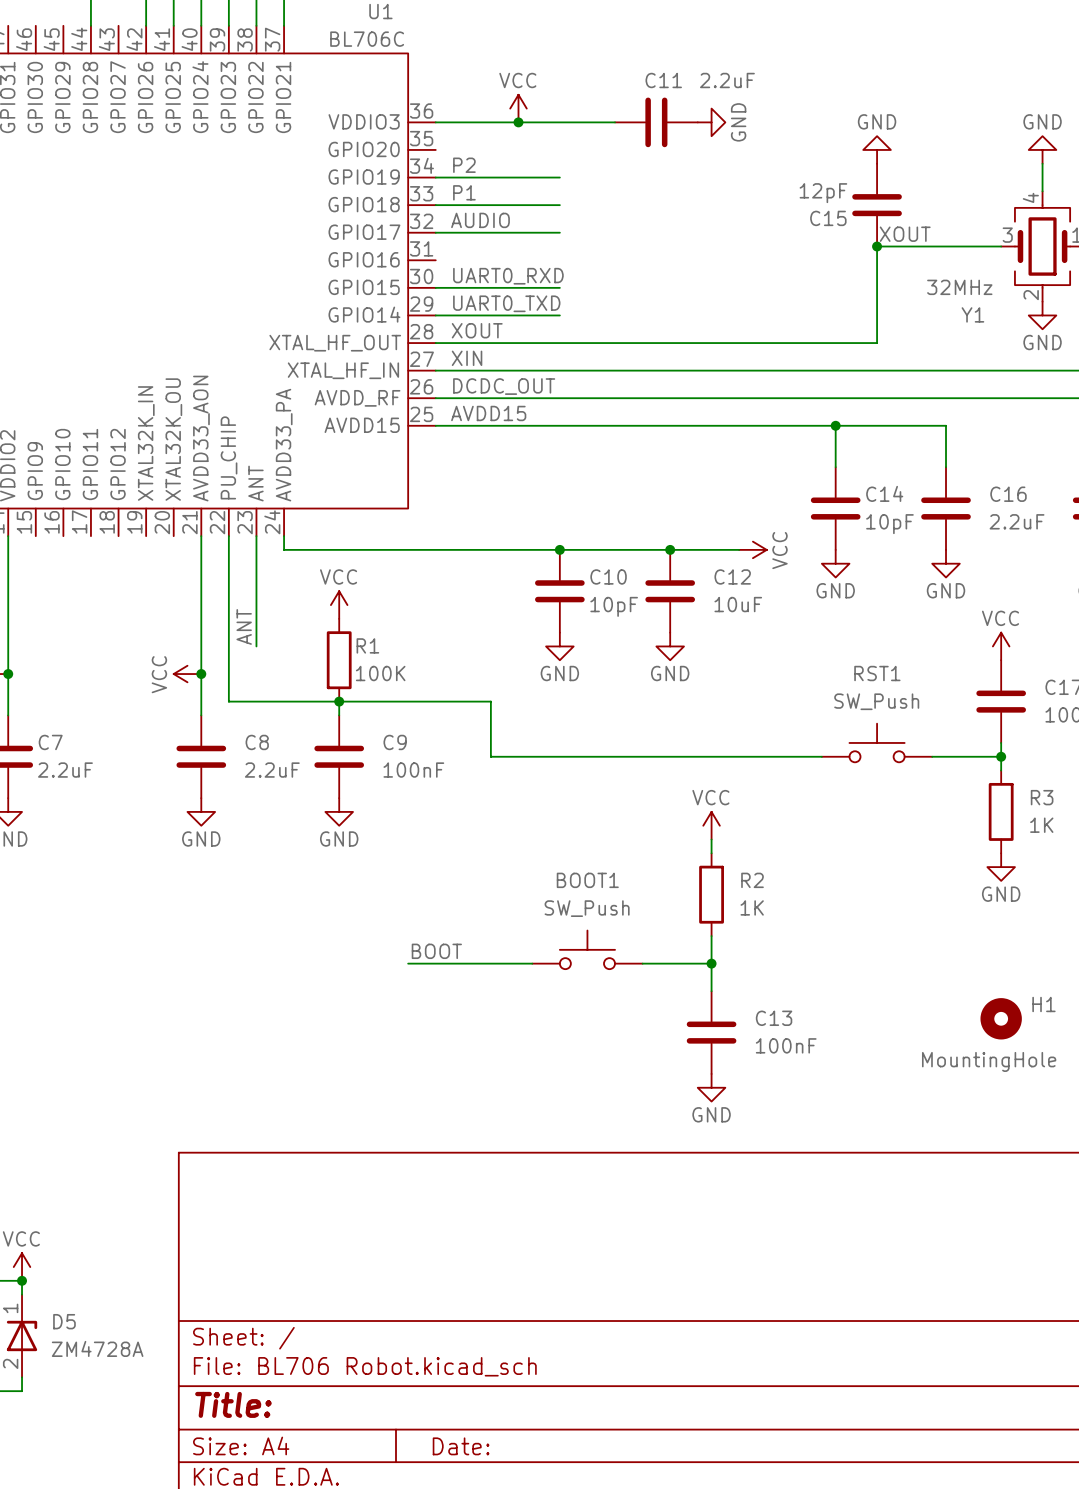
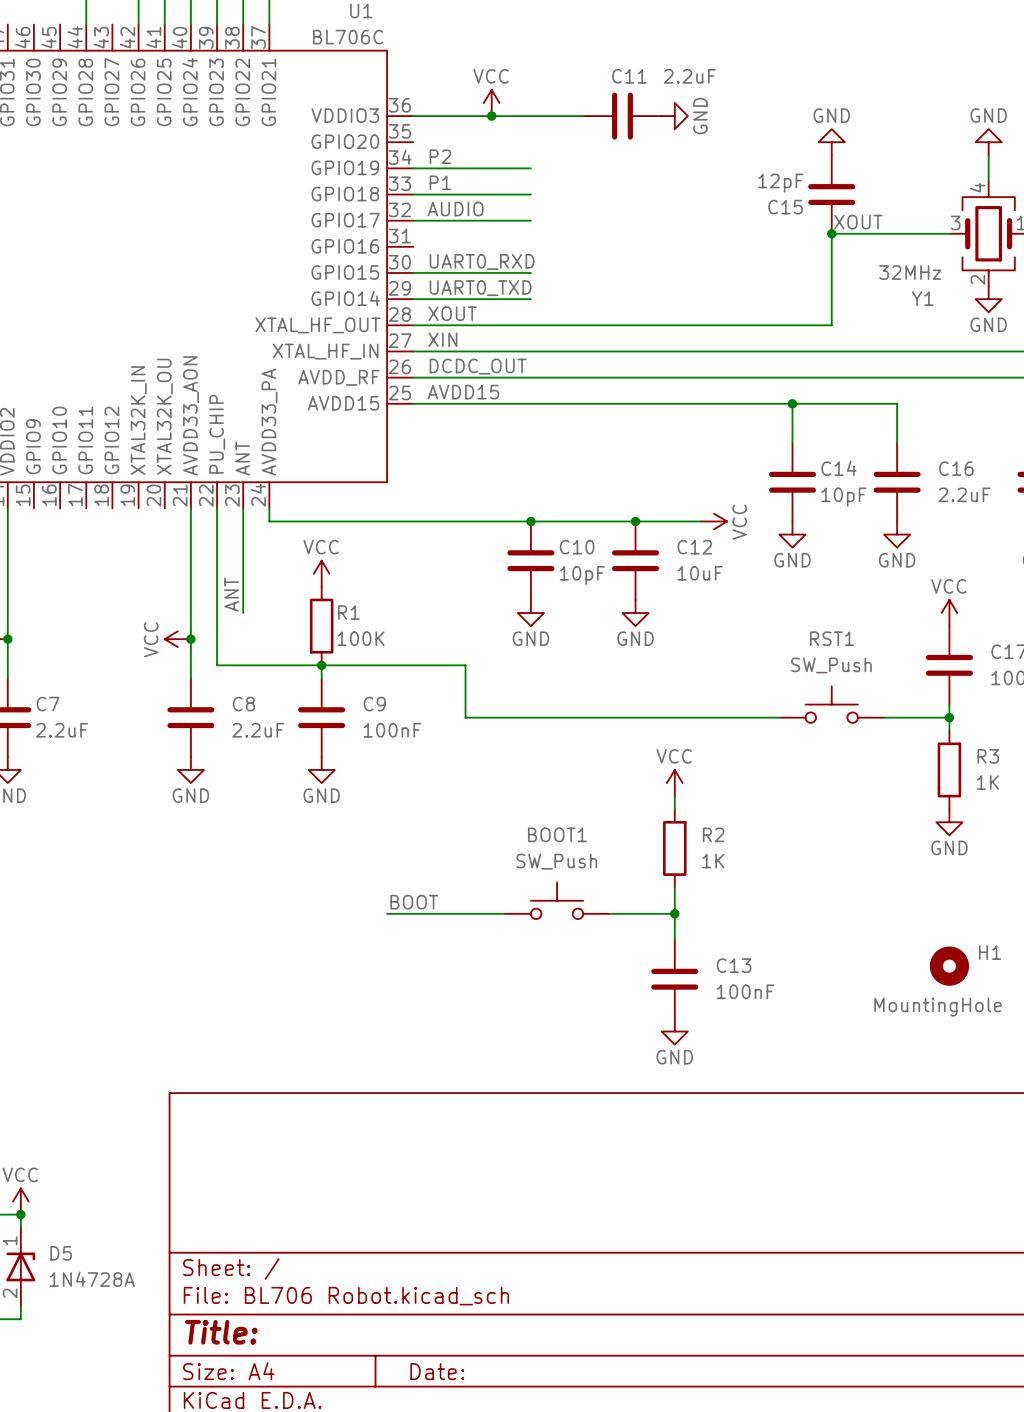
D5 value: ZM4728A (97, 1348) -> 1N4728A (92, 1279)

